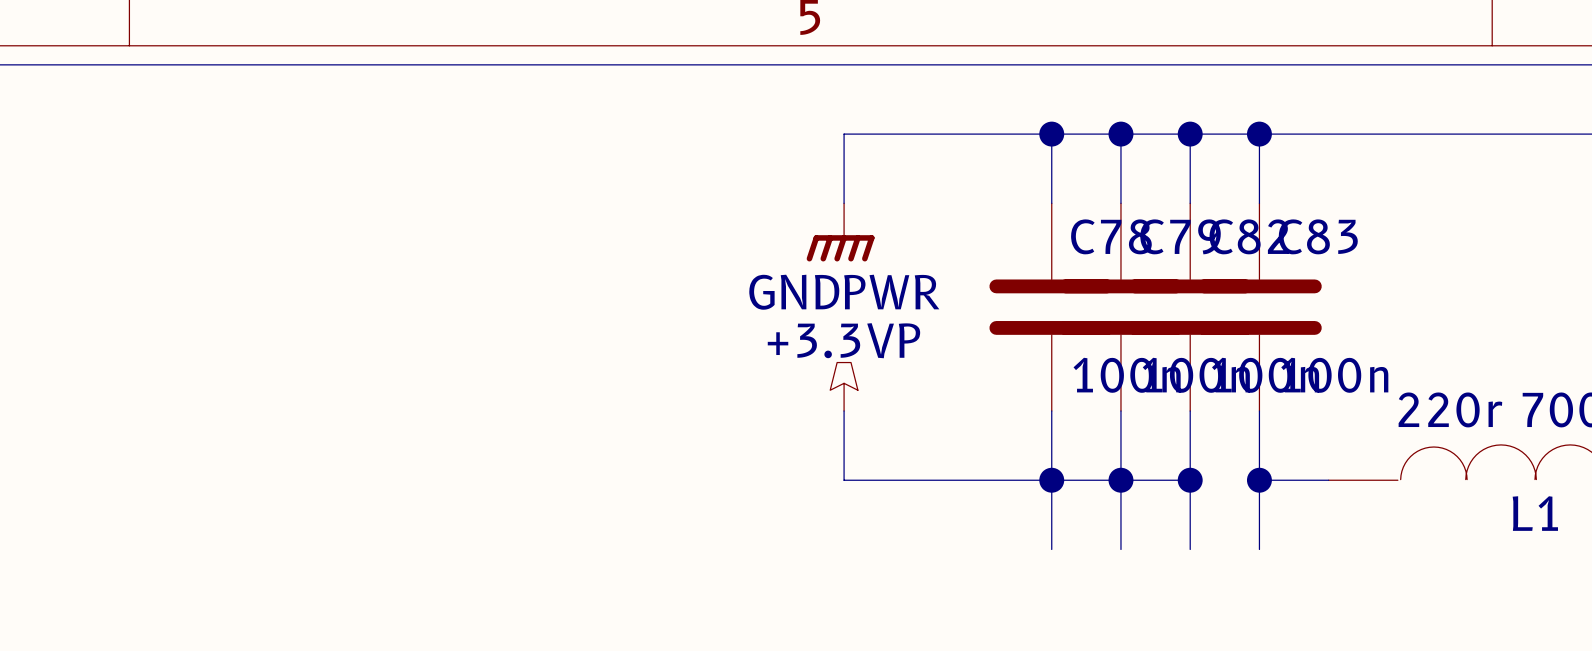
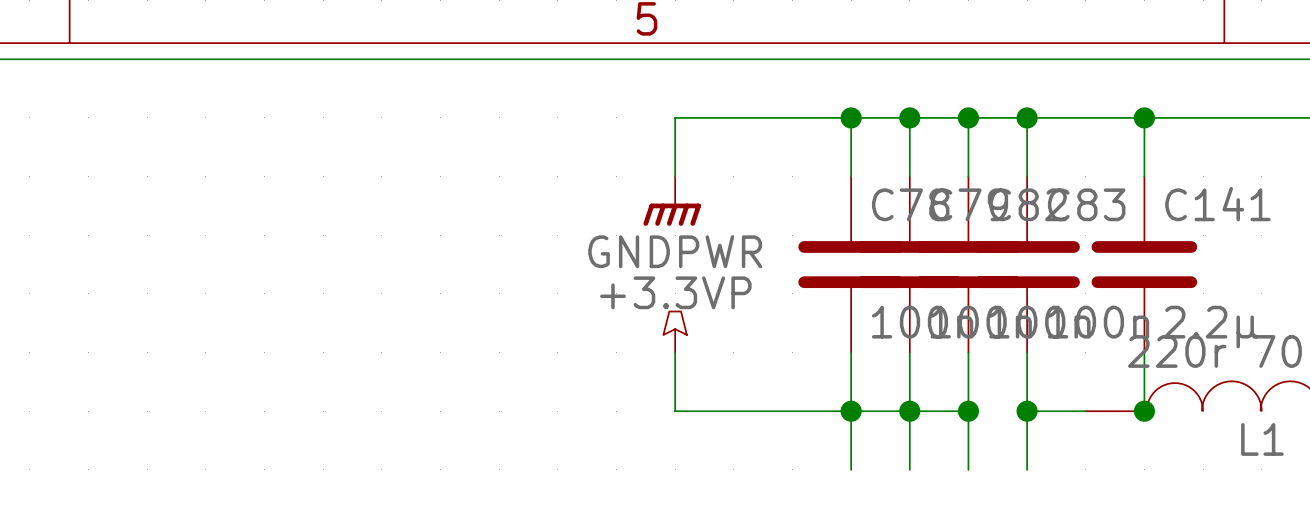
wire: none -> (1144, 117) (1144, 176)
junction: none -> (1144, 117)
C141: none -> 2.2µ (1144, 264)
wire: none -> (1144, 352) (1144, 411)
junction: none -> (1144, 411)

